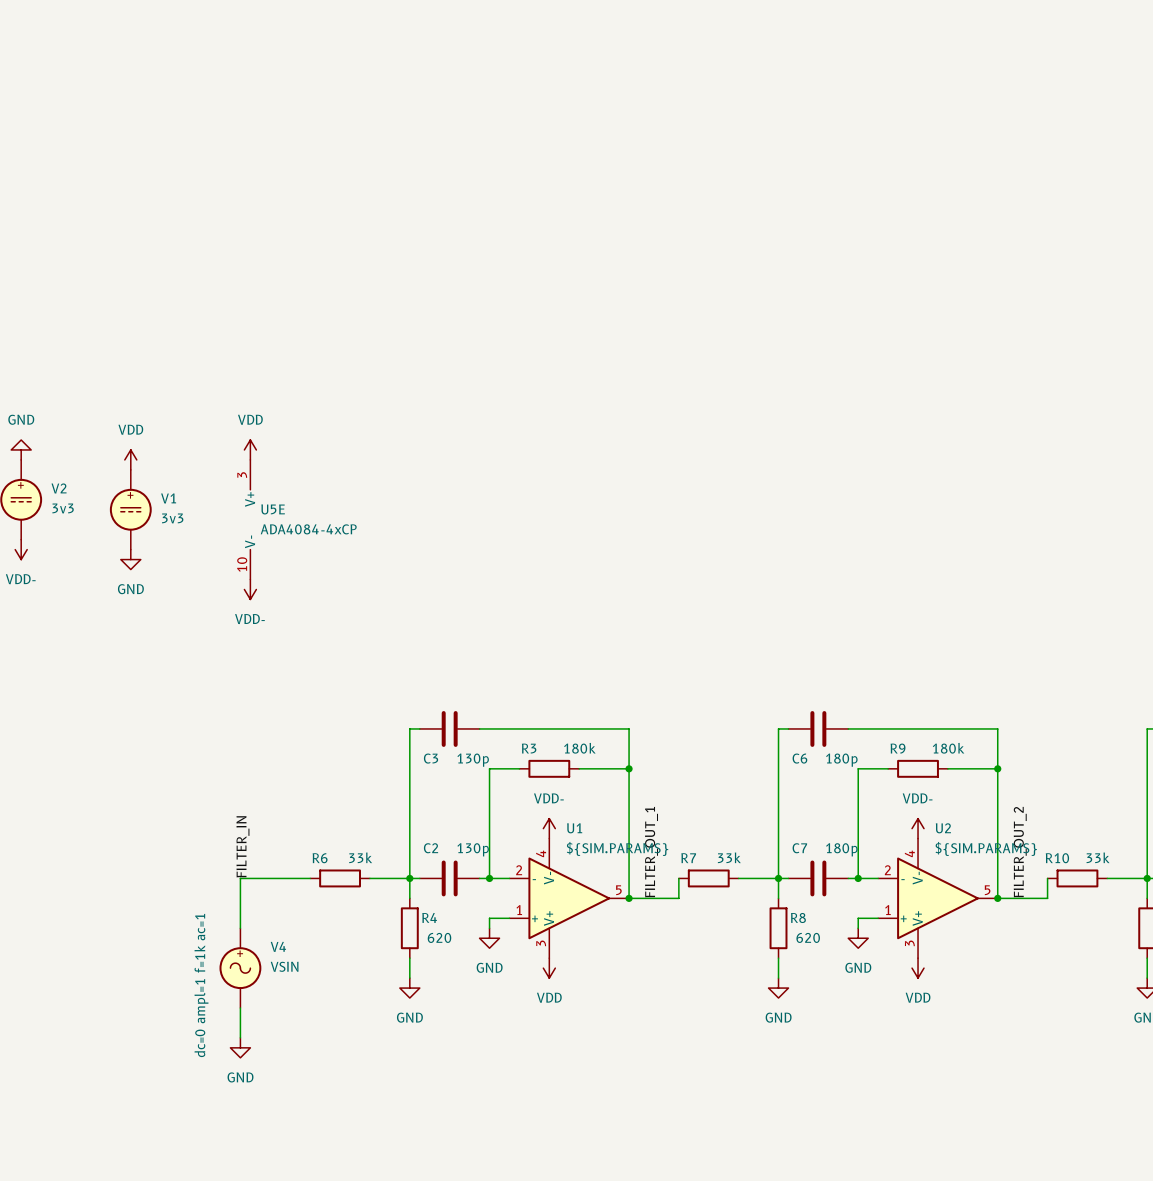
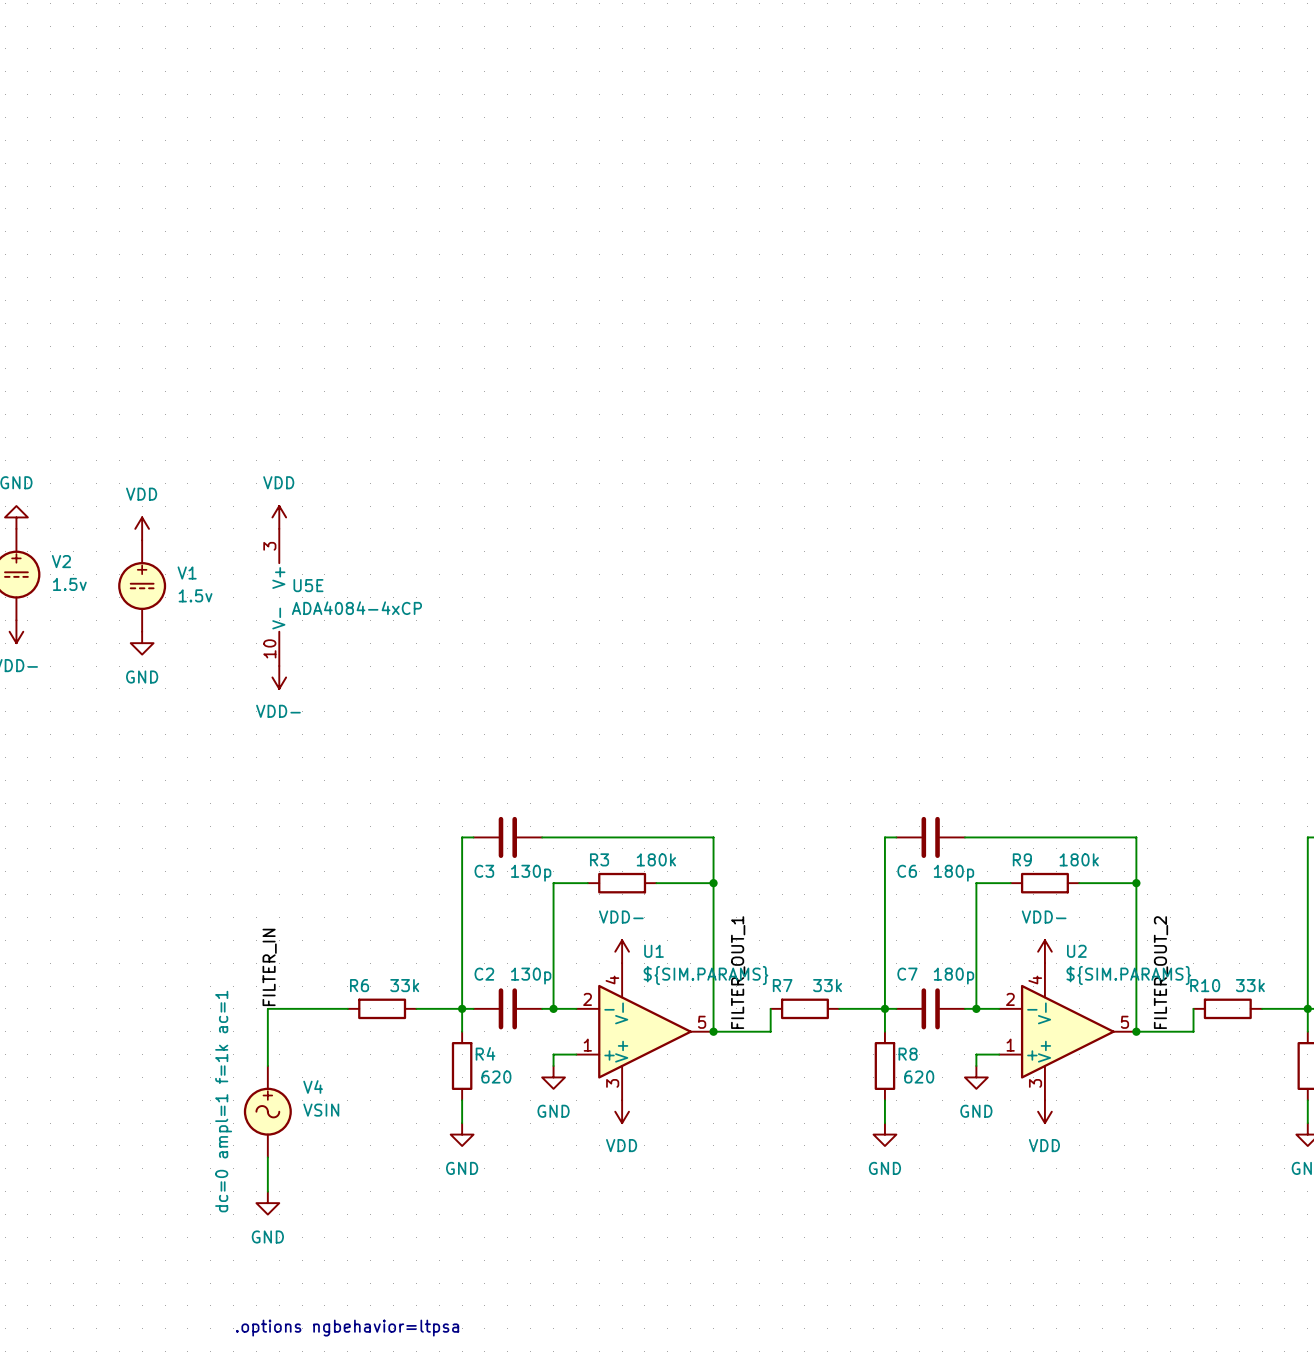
V2 value: 3v3 (63, 508) -> 1.5v (69, 584)
V1 value: 3v3 (172, 518) -> 1.5v (195, 595)
text: none -> .options ngbehavior=ltpsa (347, 1328)

